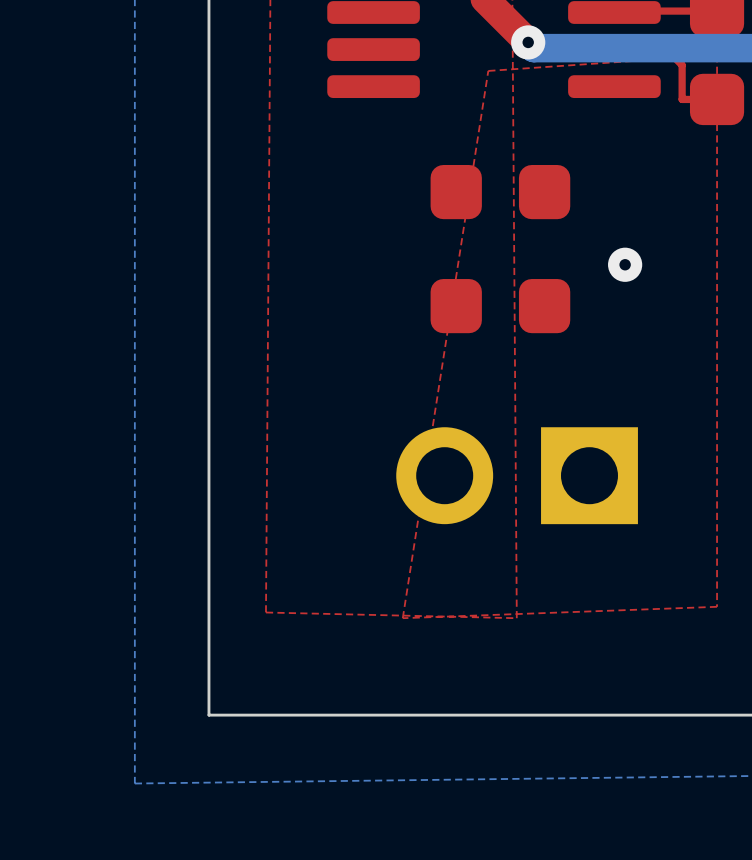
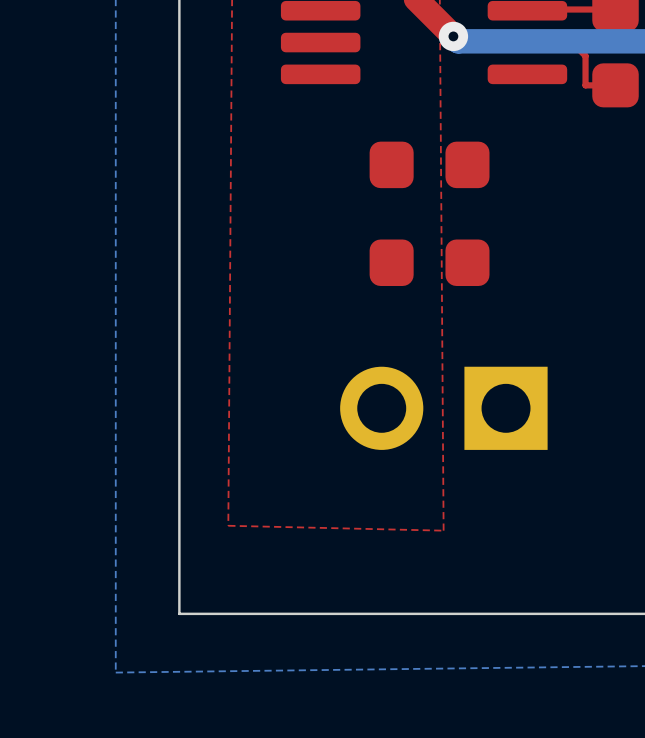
top zone outline: (717, 55) (488, 70) (402, 618) (717, 606) (717, 55) -> none
via: (625, 264) -> none

